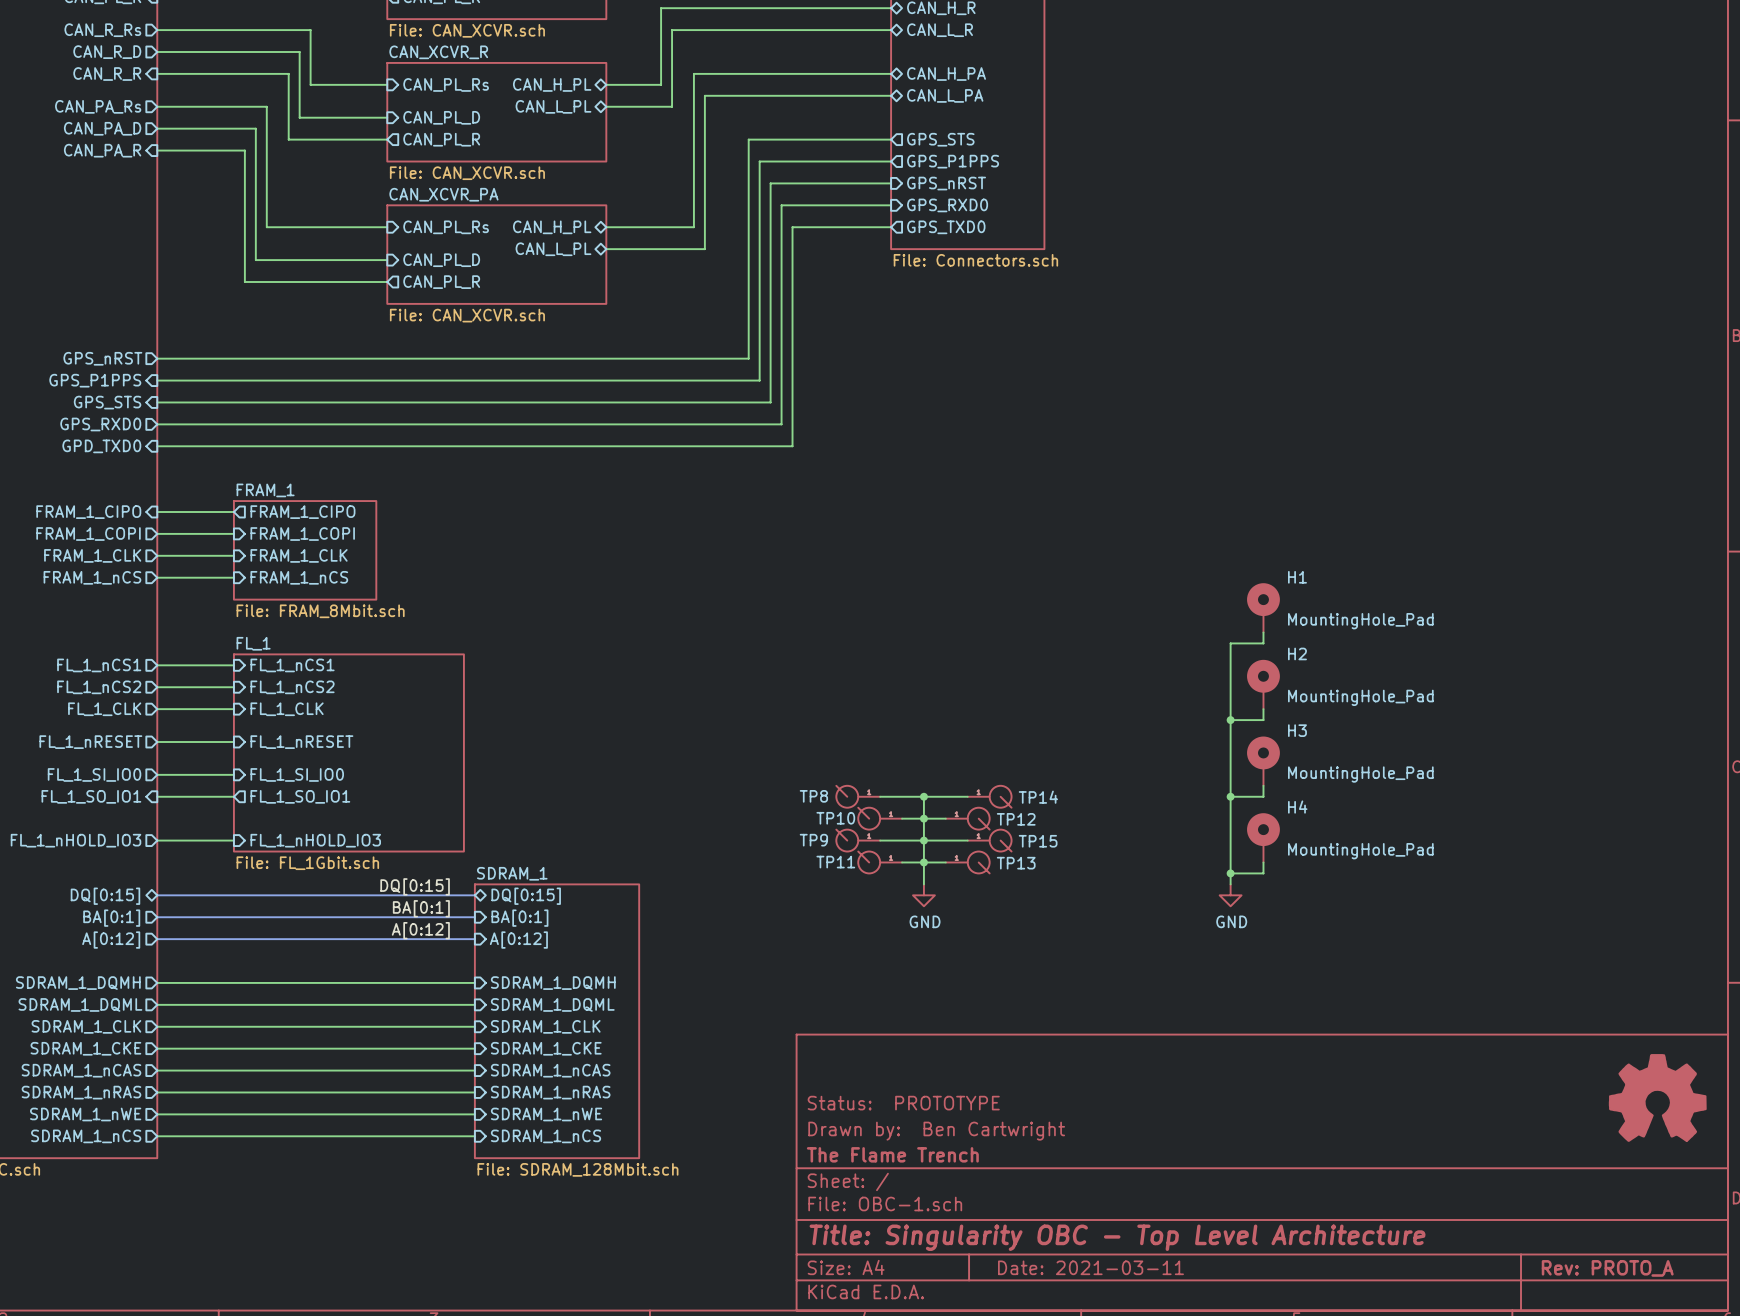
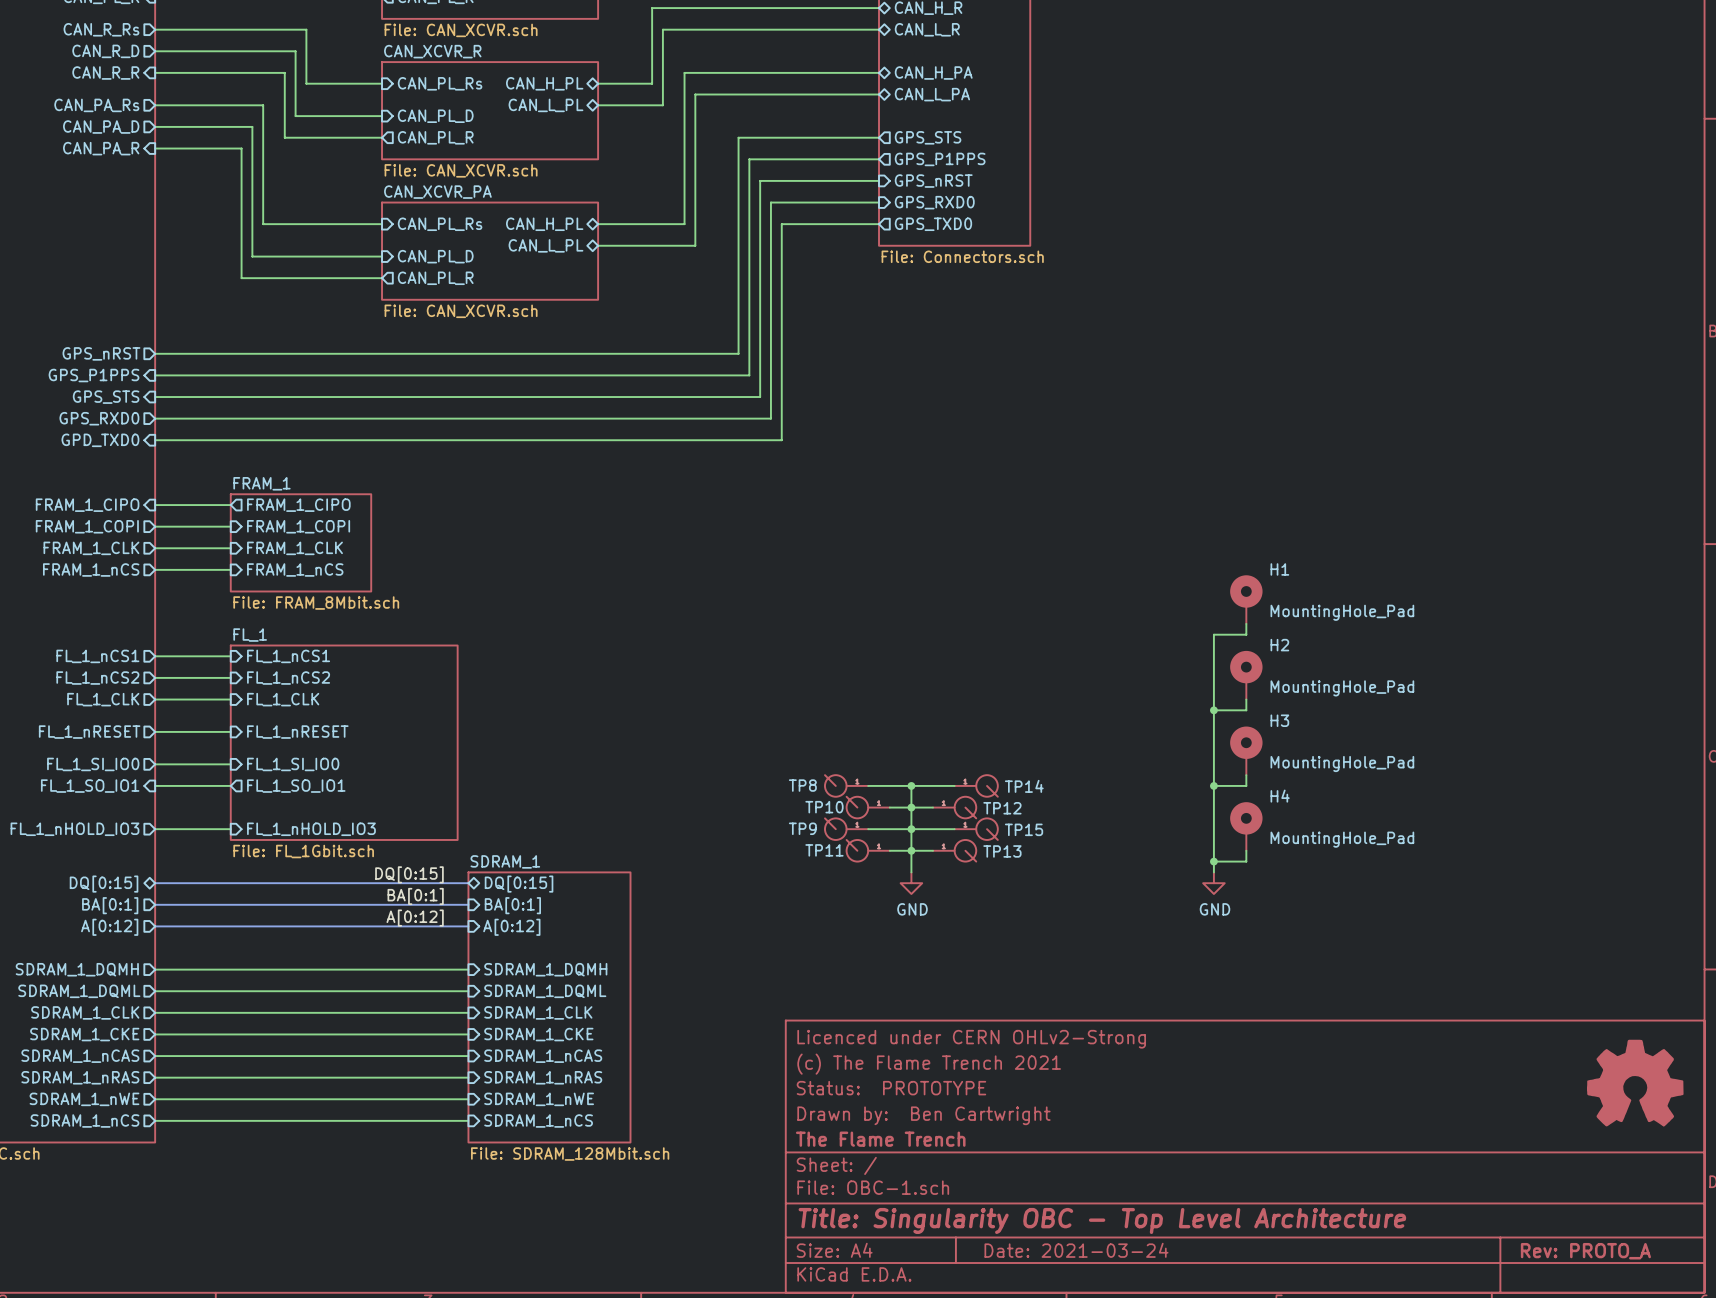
title block: none -> Licenced under CERN OHLv2-Strong (971, 1039)
title block: none -> (c) The Flame Trench 2021 (929, 1064)
title block: Date: 2021-03-11 (1090, 1267) -> Date: 2021-03-24 (1076, 1250)

